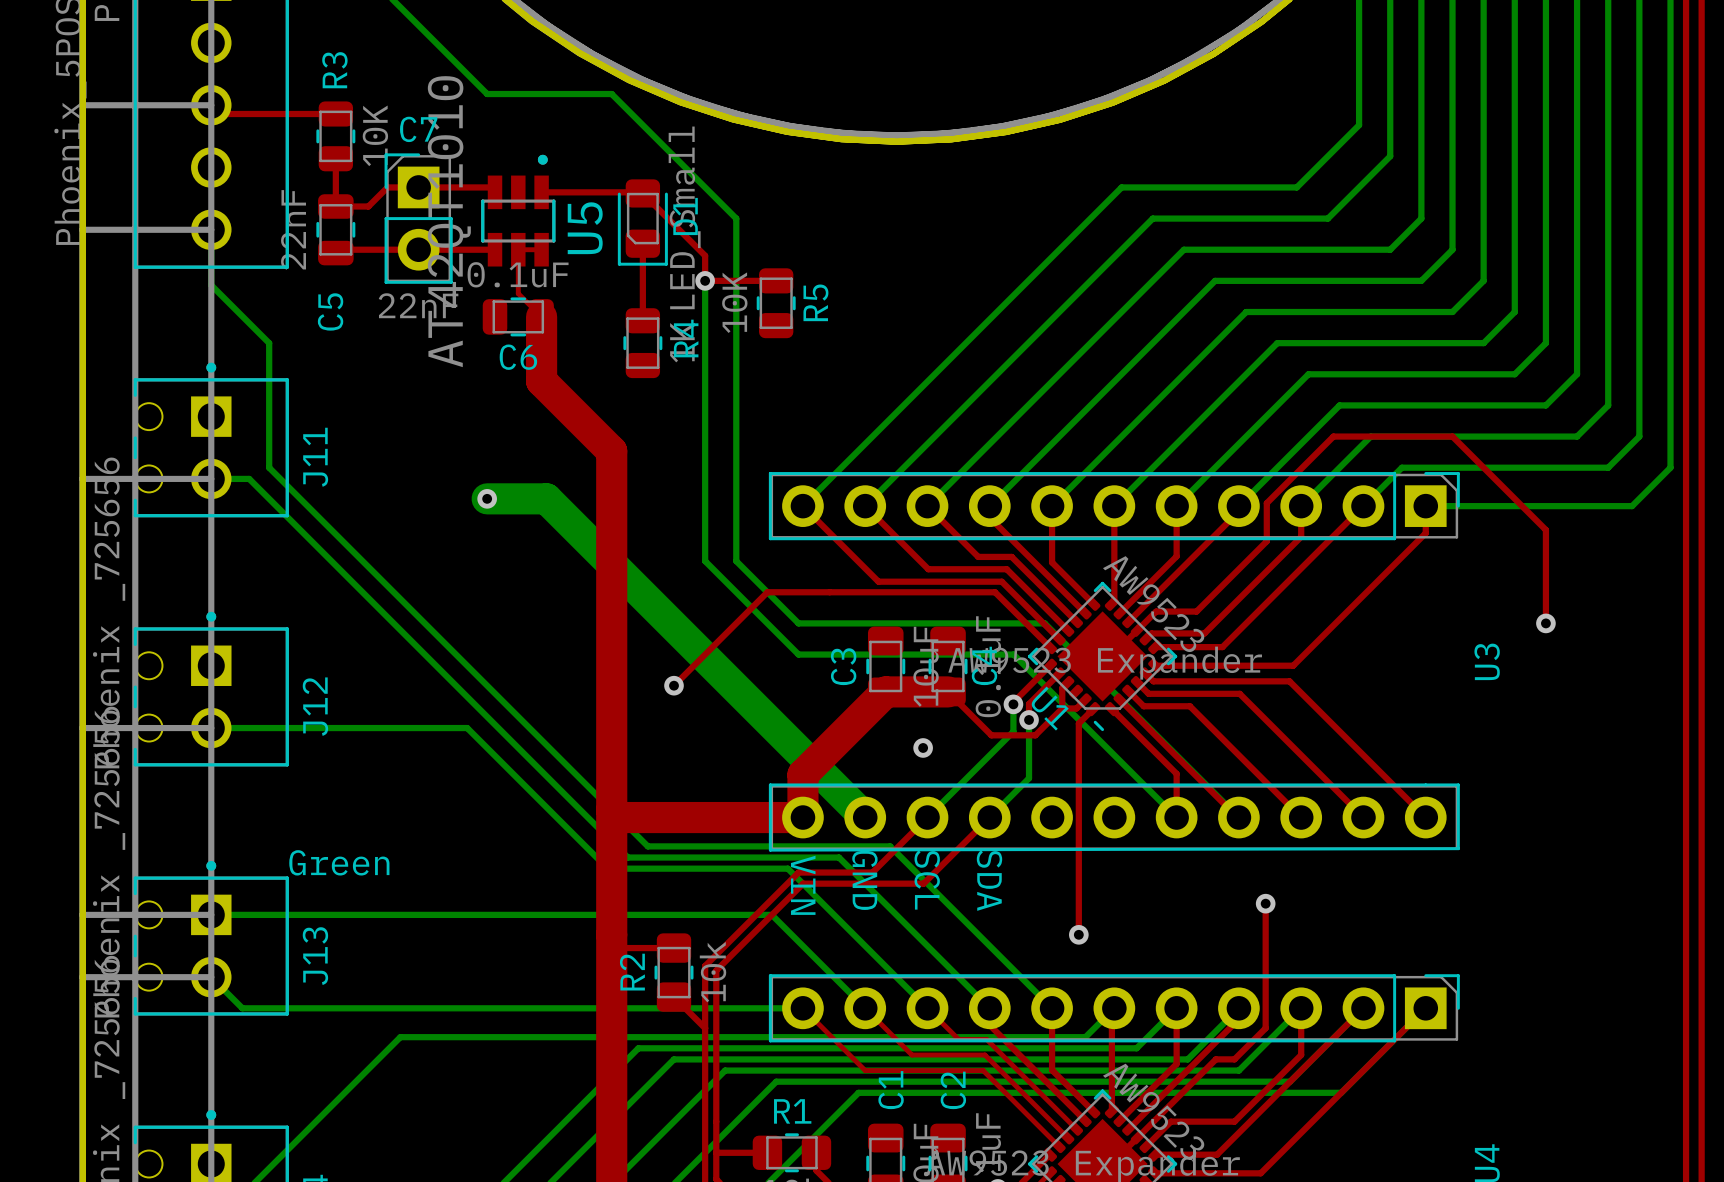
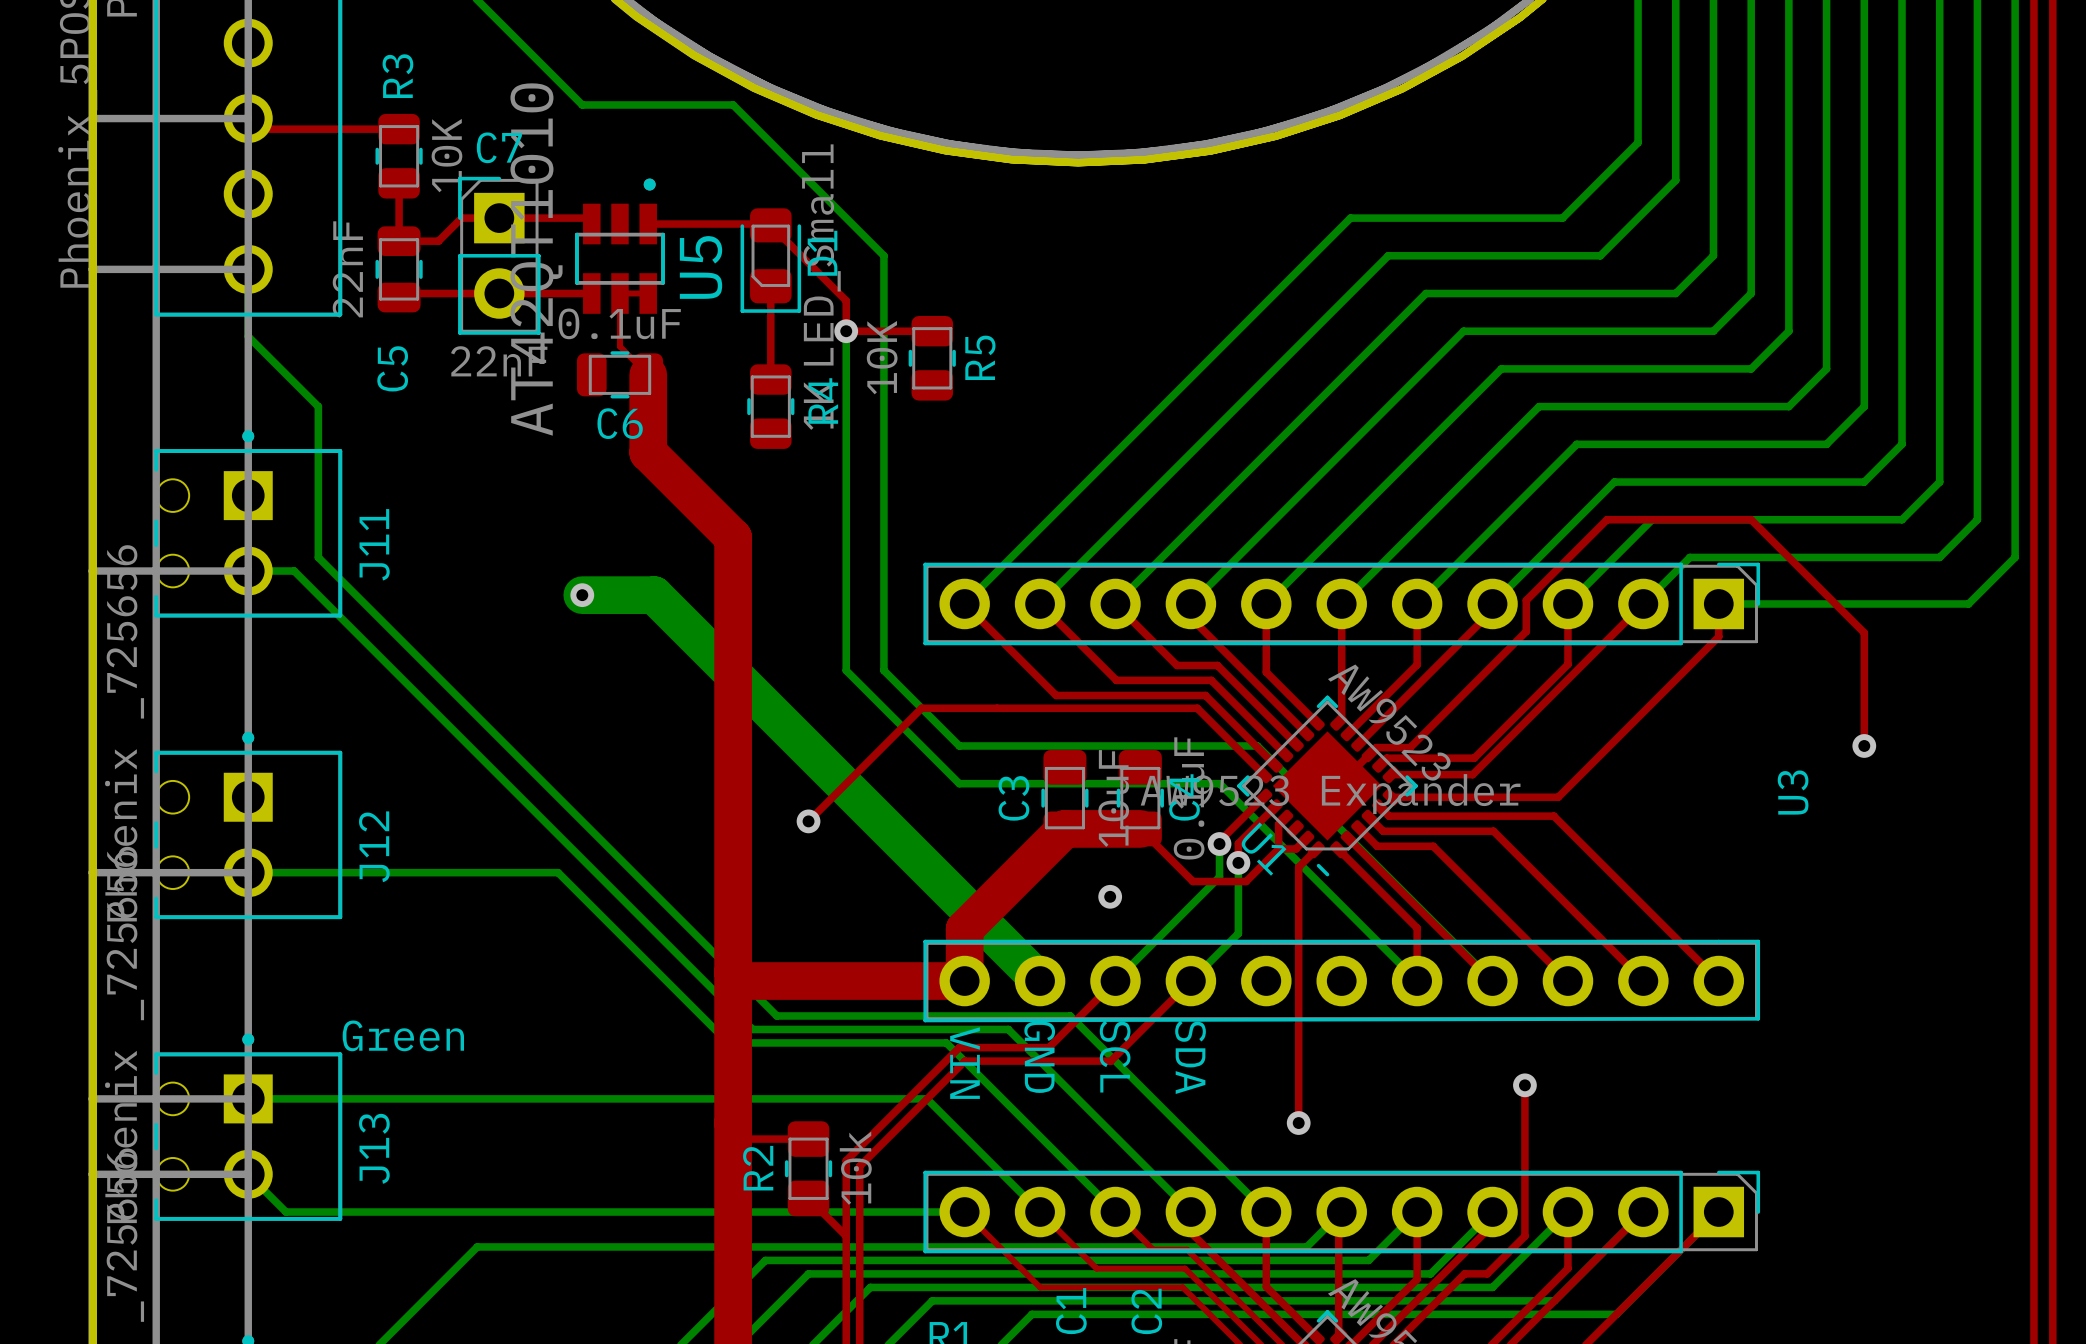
top track: (1266, 528) (1266, 541) (1196, 611) (1156, 611) (1142, 624) -> (1526, 631) (1410, 747) (1376, 747)
top track: (1301, 536) (1204, 633) -> (1567, 641) (1567, 664) (1474, 758) (1450, 758)

